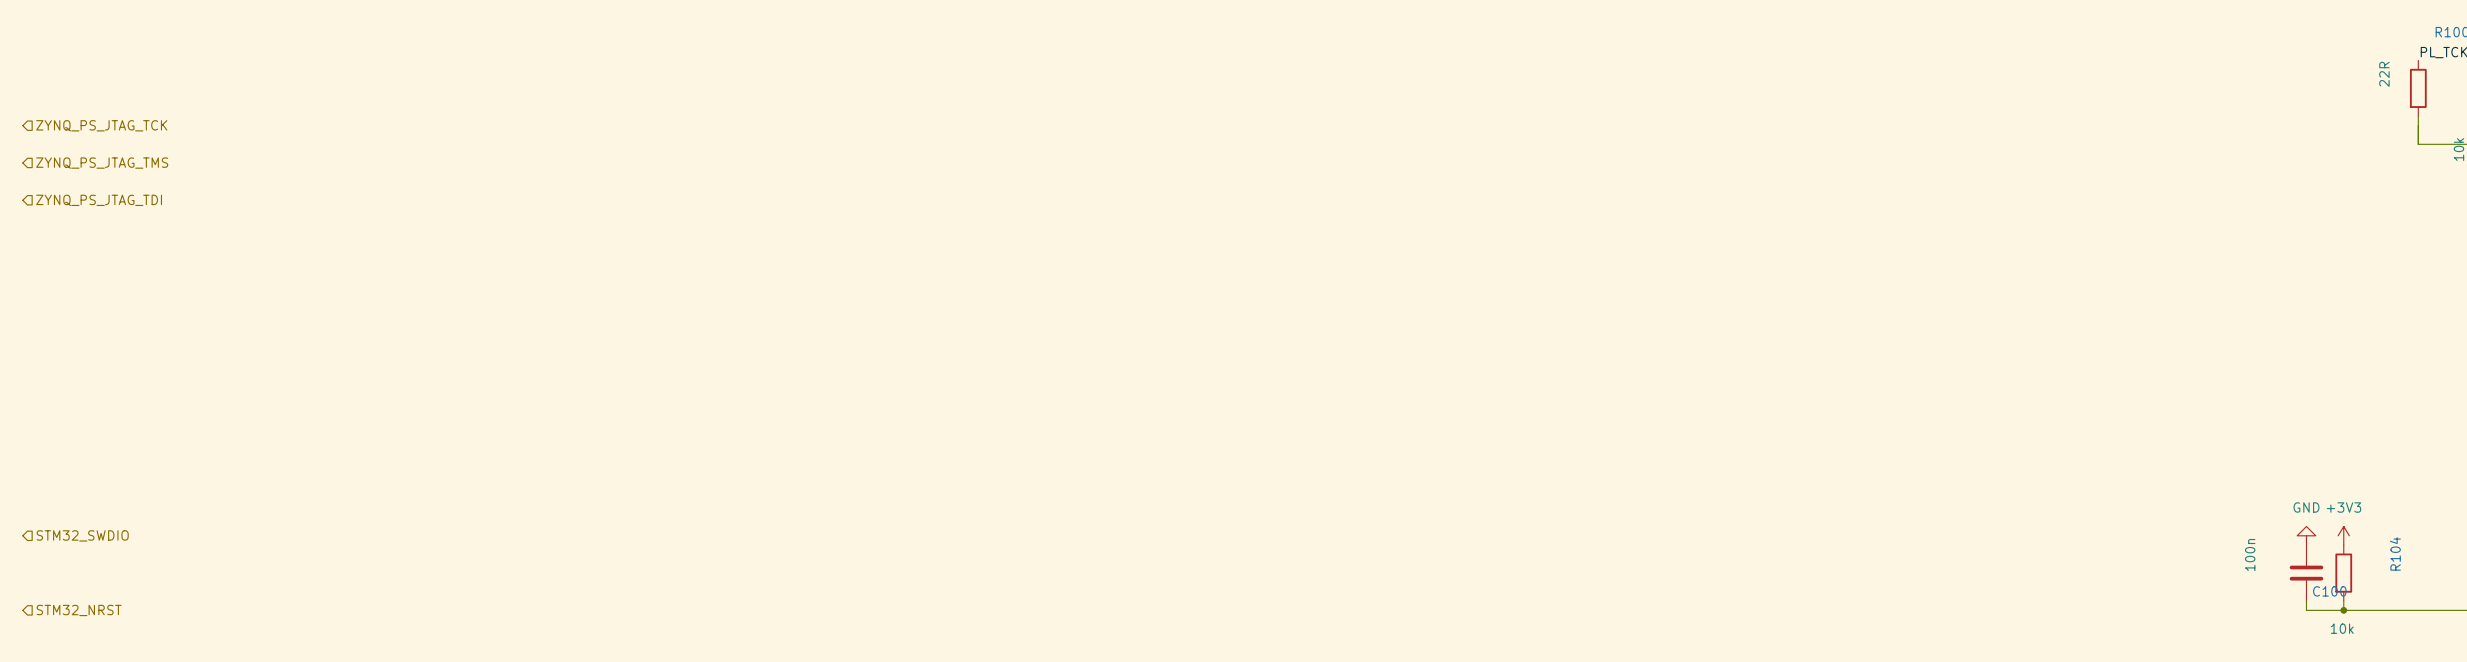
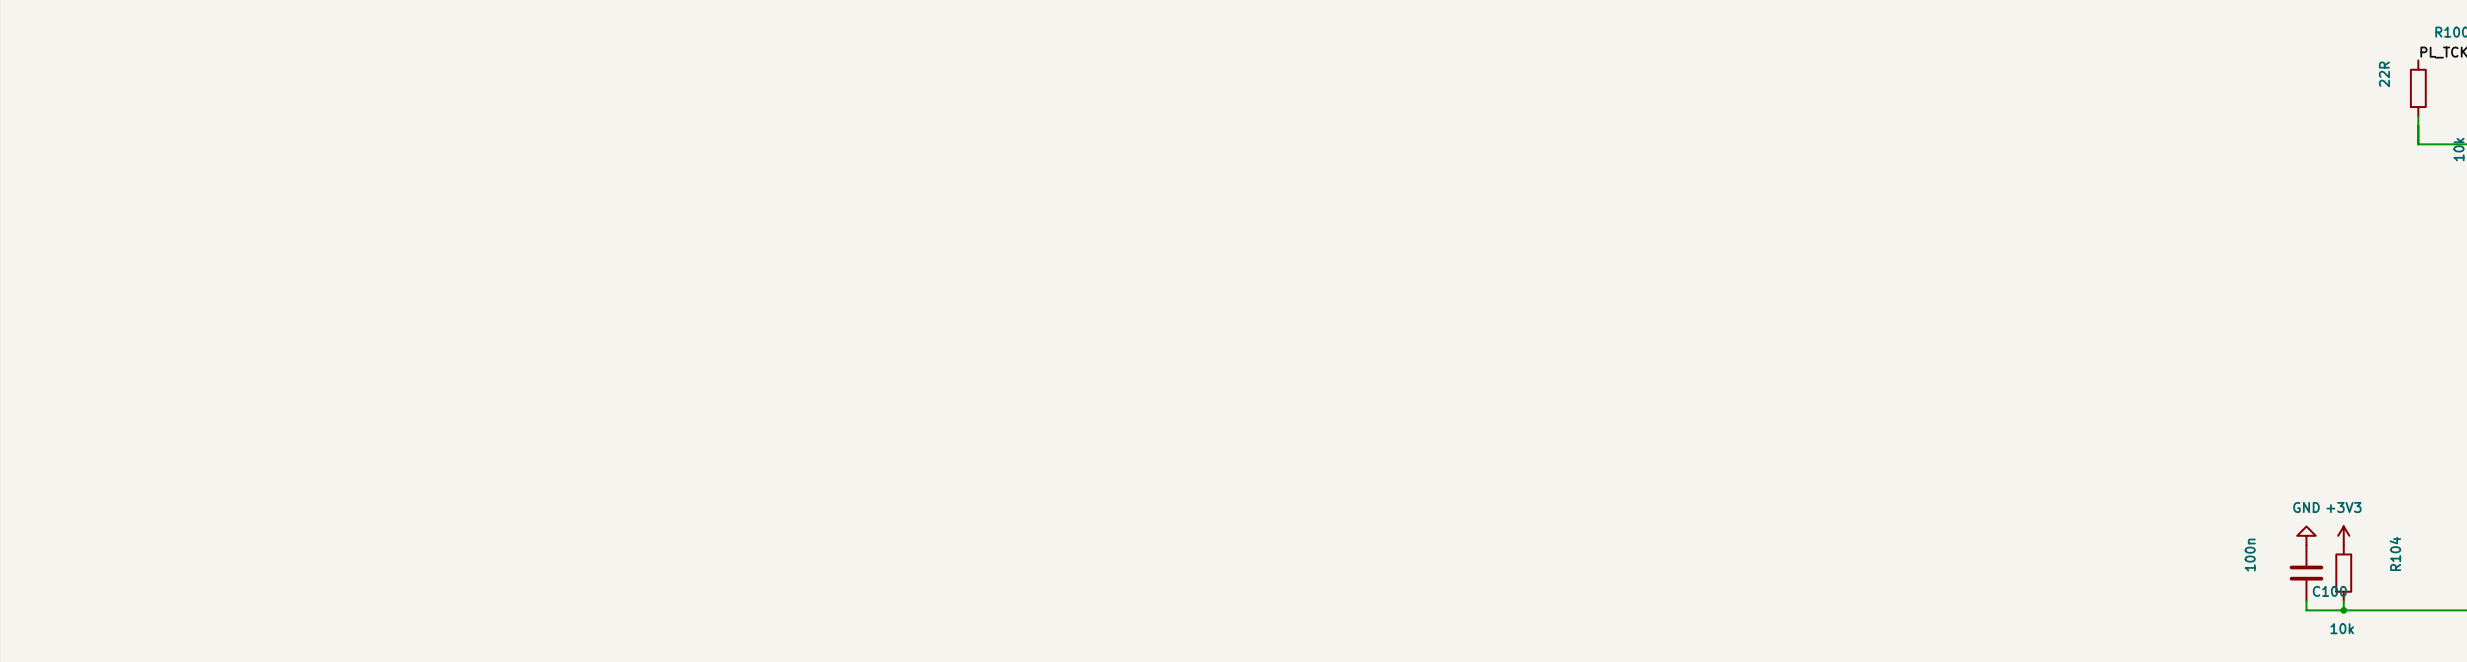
hierarchical label: ZYNQ_PS_JTAG_TCK (101, 125) -> none
hierarchical label: ZYNQ_PS_JTAG_TMS (102, 163) -> none
hierarchical label: ZYNQ_PS_JTAG_TDI (99, 200) -> none
hierarchical label: STM32_SWDIO (82, 535) -> none
hierarchical label: STM32_NRST (79, 610) -> none

